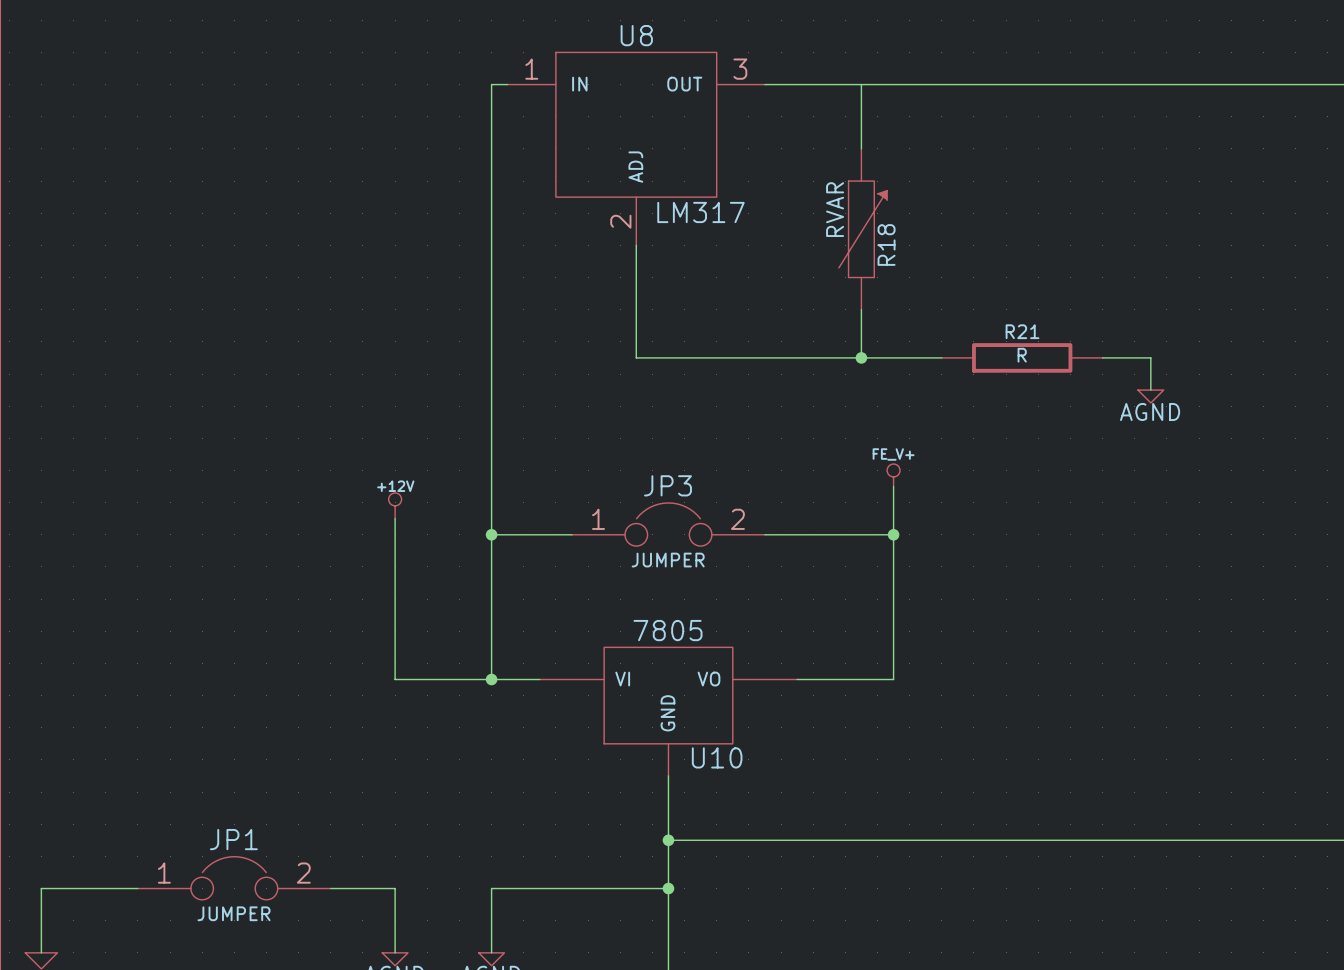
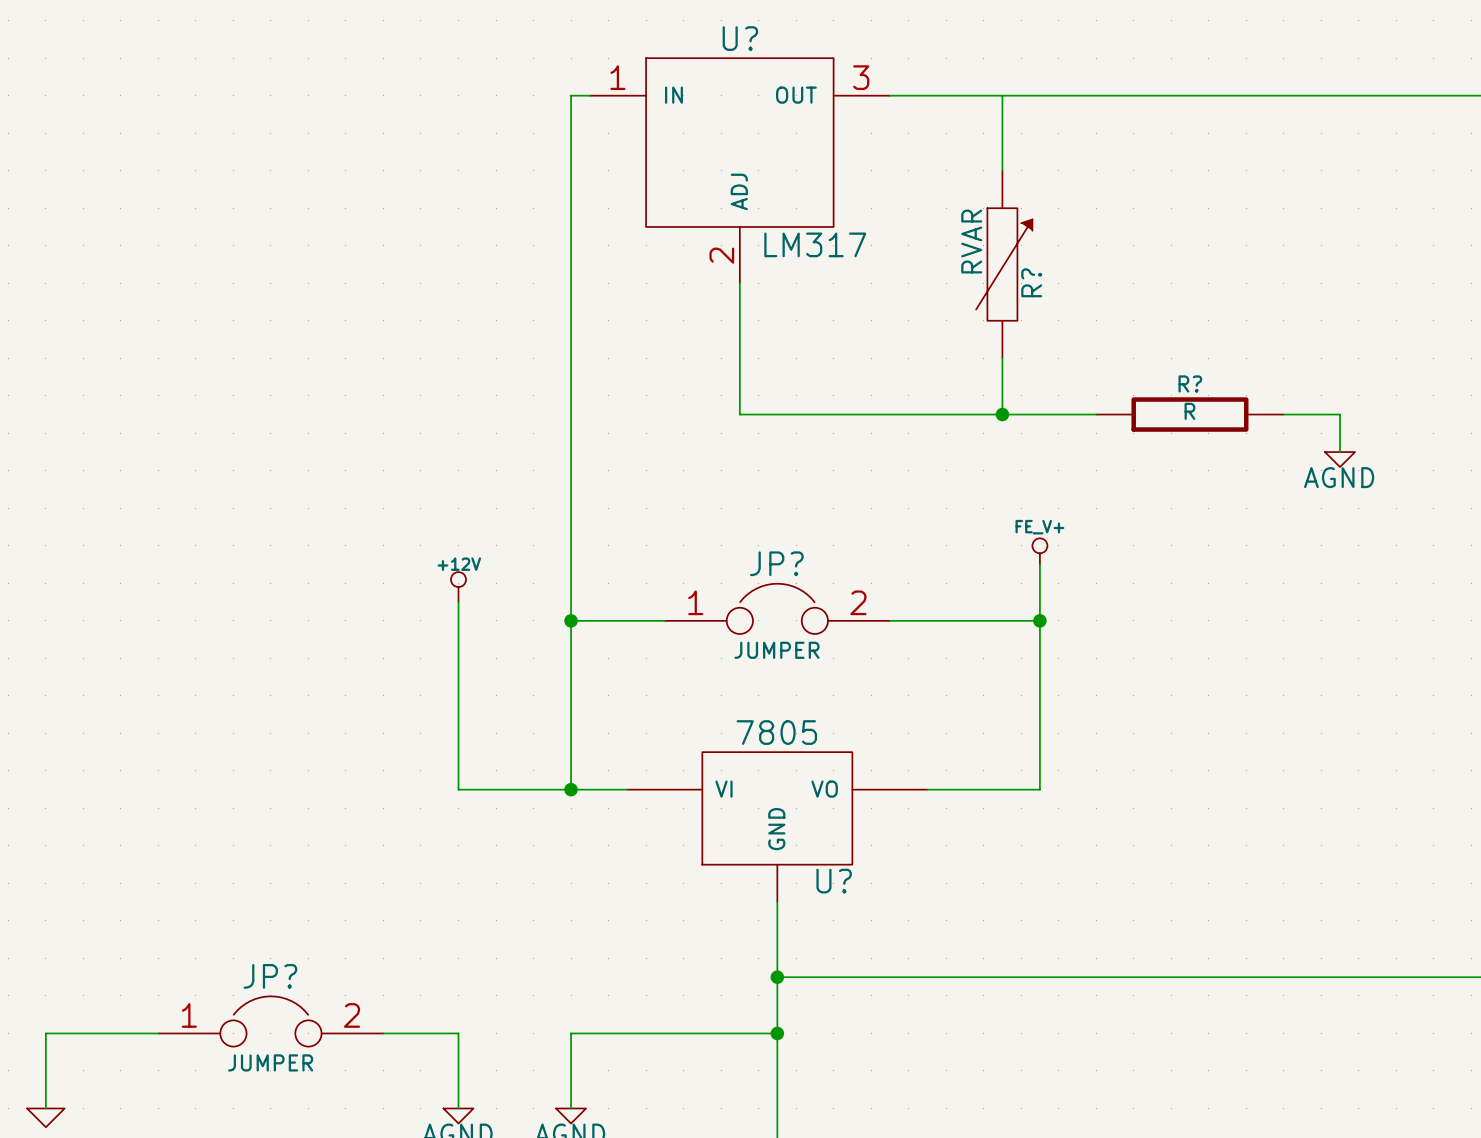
U8 name: U8 (636, 35) -> U? (740, 38)
R18 name: R18 (886, 244) -> R? (1031, 282)
R21 name: R21 (1022, 331) -> R? (1190, 383)
JP3 name: JP3 (668, 485) -> JP? (776, 563)
U10 name: U10 (717, 757) -> U? (834, 881)
JP1 name: JP1 (233, 839) -> JP? (270, 976)

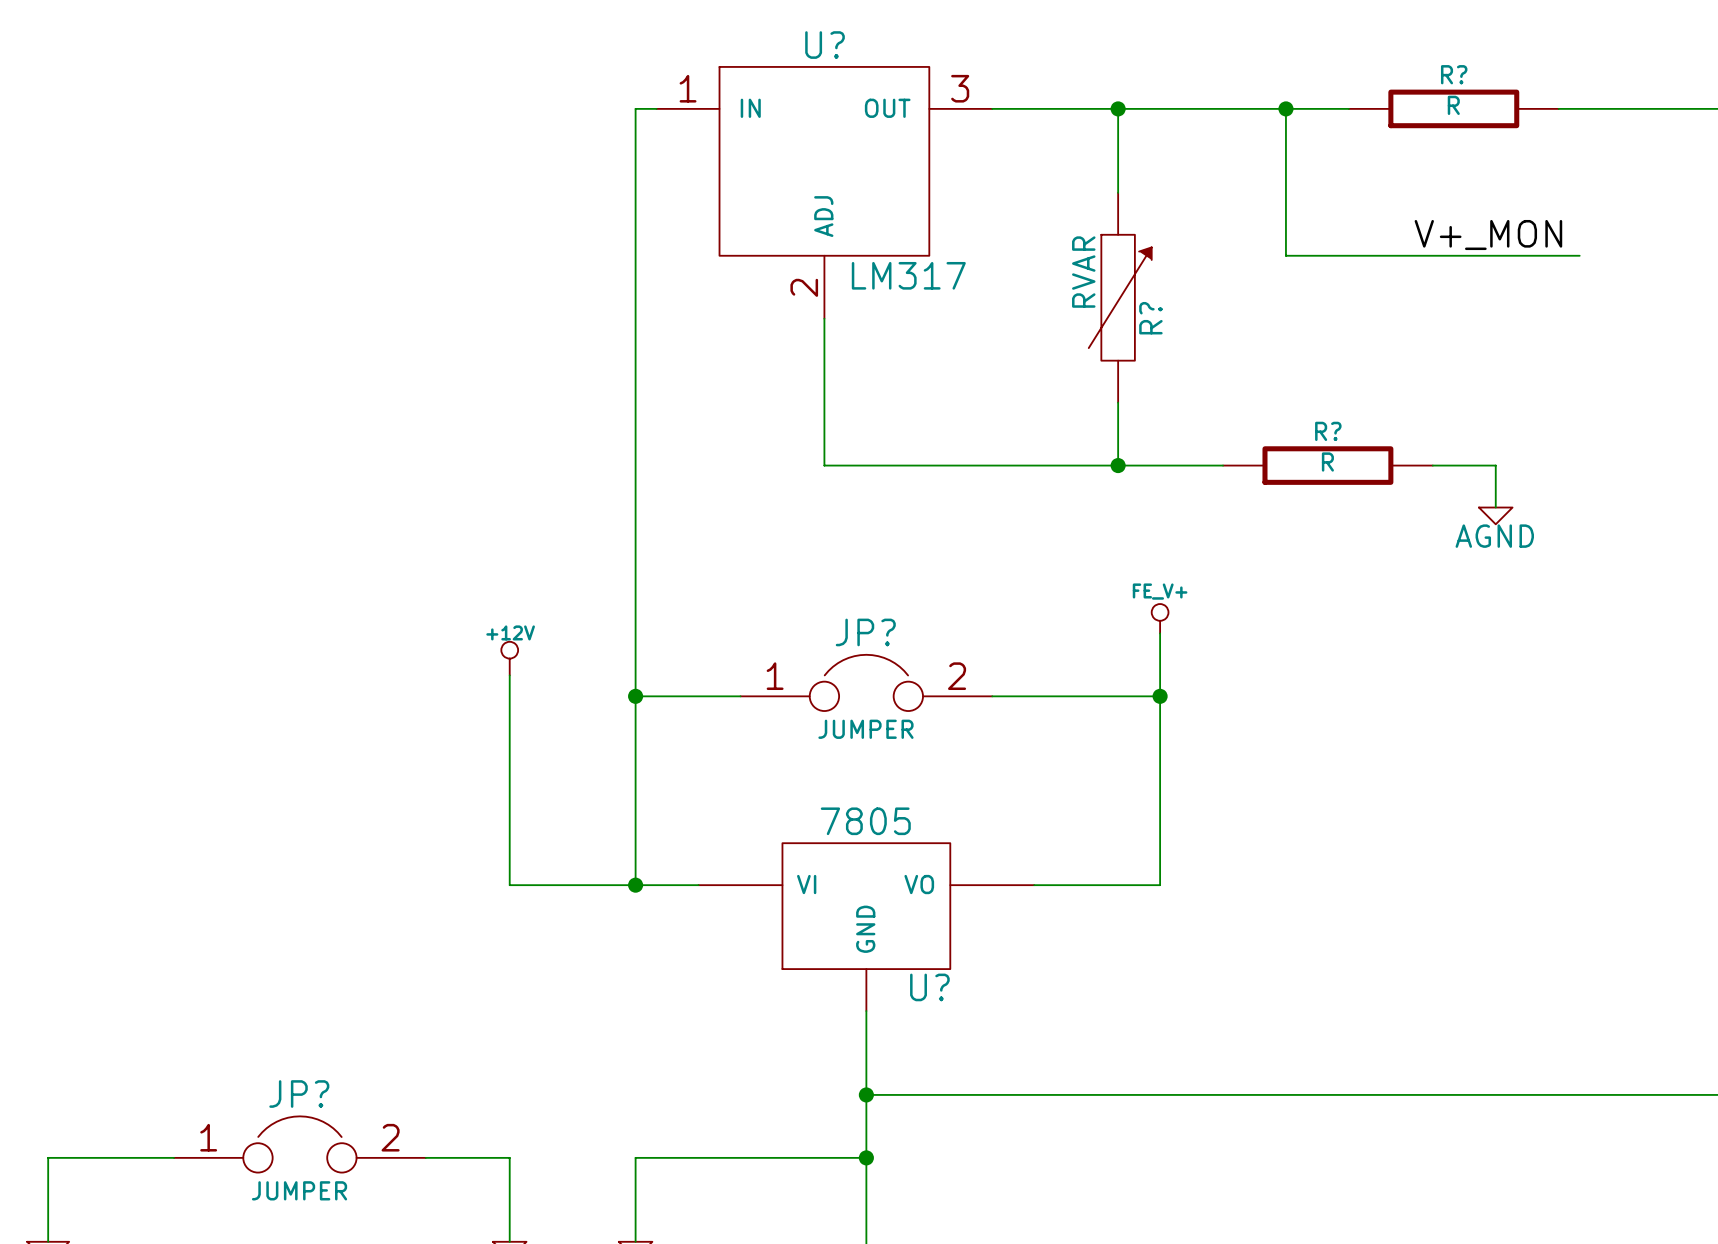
junction: none -> (1118, 108)
wire: none -> (1285, 108) (1285, 255) (1579, 255)
junction: none -> (1285, 108)
wire: (1208, 95) (1396, 95) -> none
R?: none -> R (1453, 108)
label: none -> V+_MON (1488, 235)

